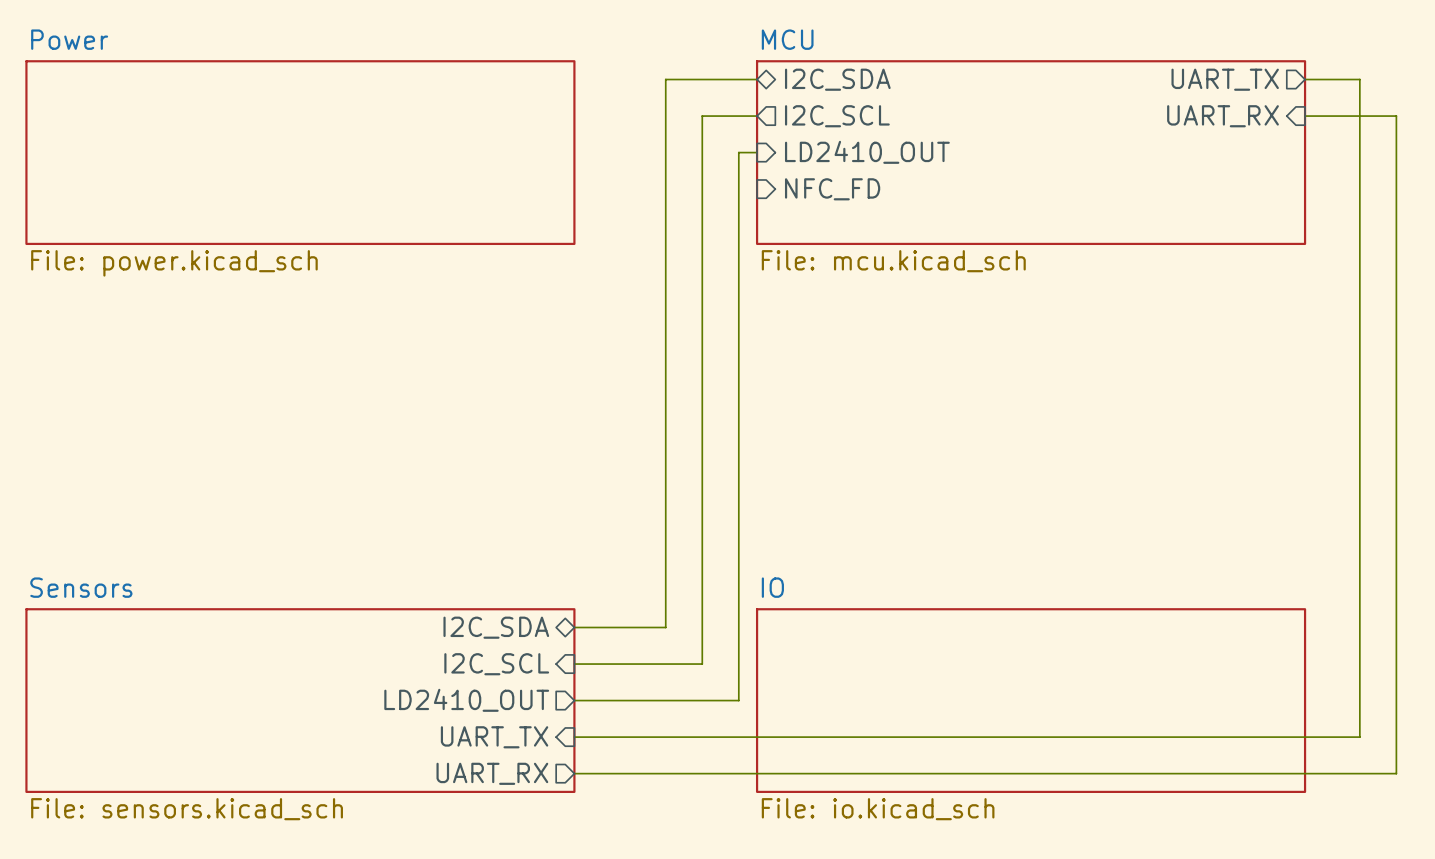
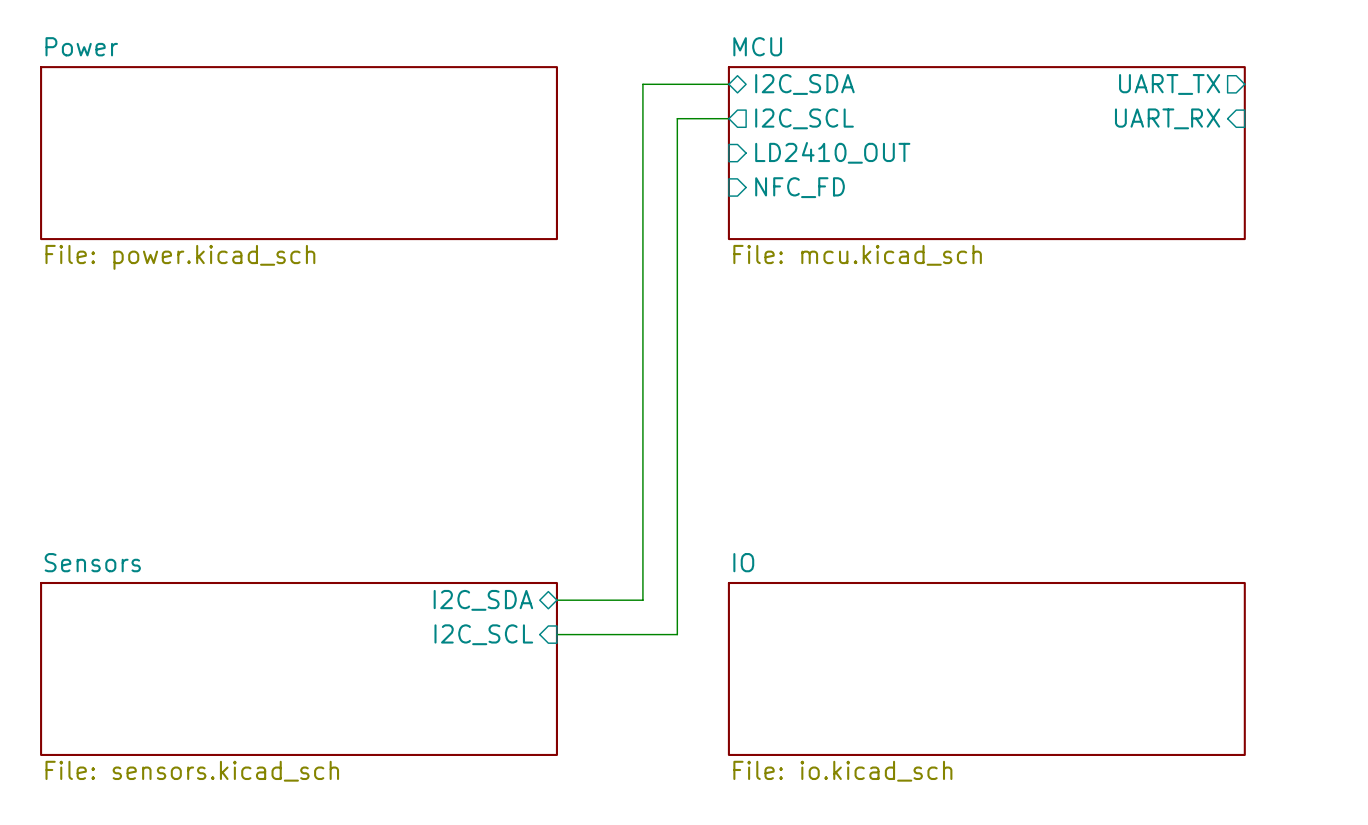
wire: (1305, 79) (1359, 79) (1359, 737) (574, 737) -> none
wire: (1305, 116) (1396, 116) (1396, 773) (574, 773) -> none
wire: (757, 152) (738, 152) (738, 700) (574, 700) -> none
sheet pin: LD2410_OUT (466, 700) -> none
sheet pin: UART_TX (494, 737) -> none
sheet pin: UART_RX (492, 773) -> none

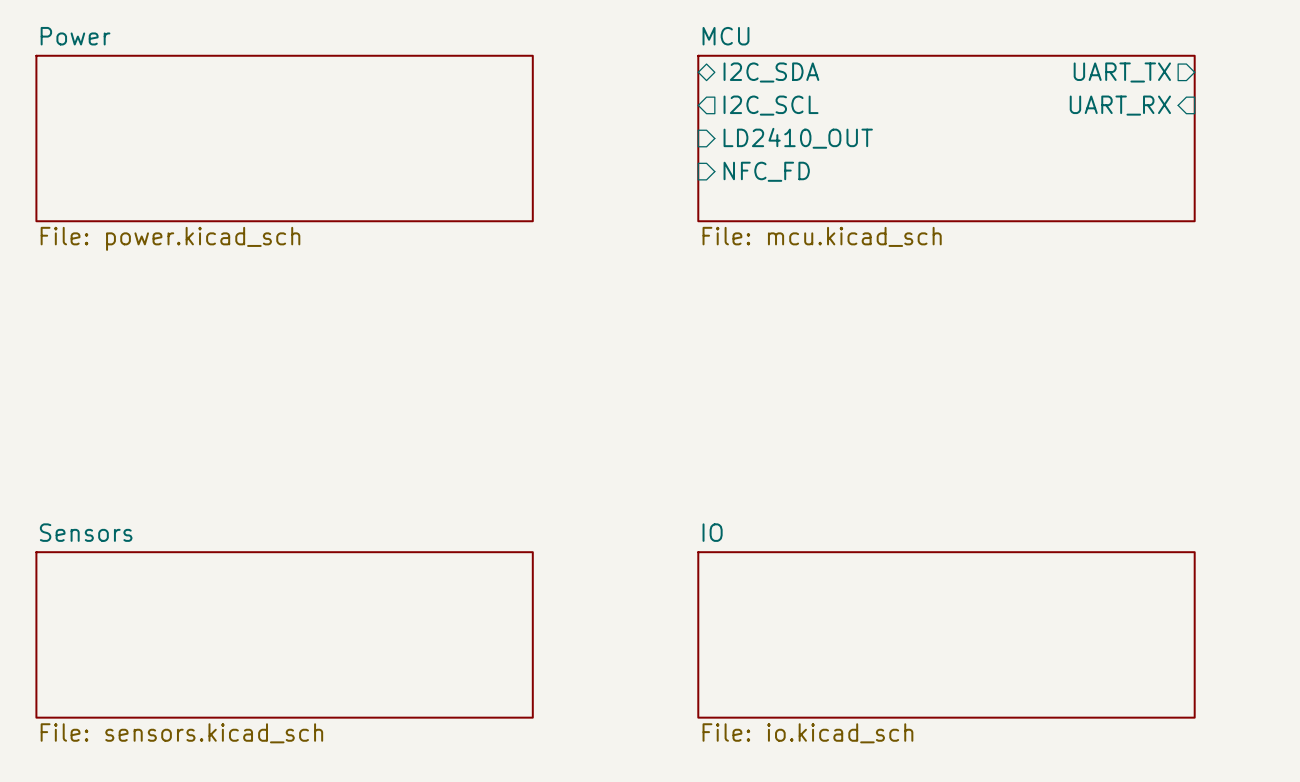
wire: (728, 84) (642, 84) (642, 600) (556, 600) -> none
wire: (728, 118) (677, 118) (677, 634) (556, 634) -> none
sheet pin: I2C_SDA (483, 600) -> none
sheet pin: I2C_SCL (483, 634) -> none

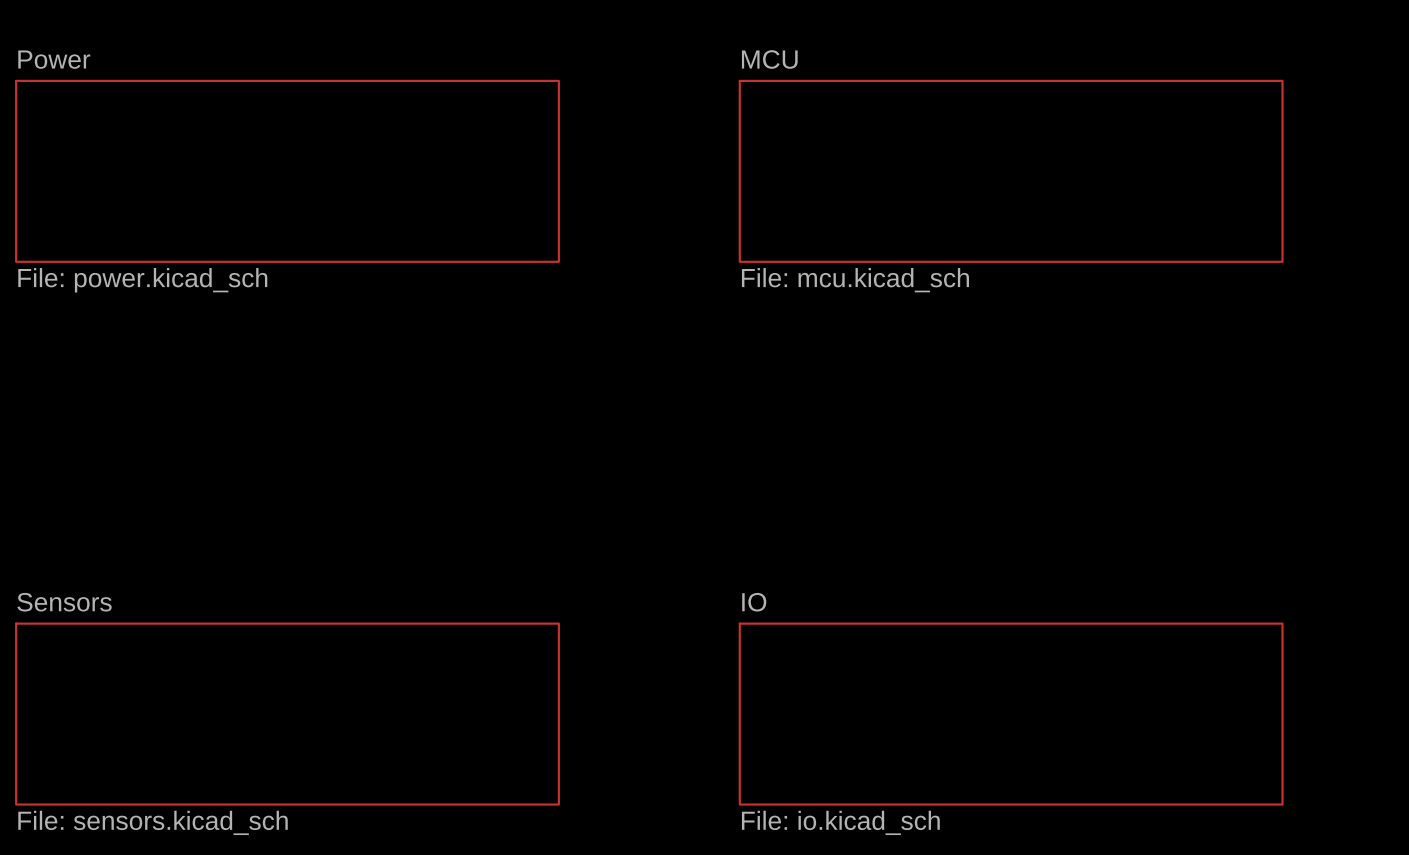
sheet pin: I2C_SDA (771, 72) -> none
sheet pin: UART_TX (1122, 72) -> none
sheet pin: I2C_SCL (771, 105) -> none
sheet pin: UART_RX (1120, 105) -> none
sheet pin: LD2410_OUT (798, 138) -> none
sheet pin: NFC_FD (766, 171) -> none

